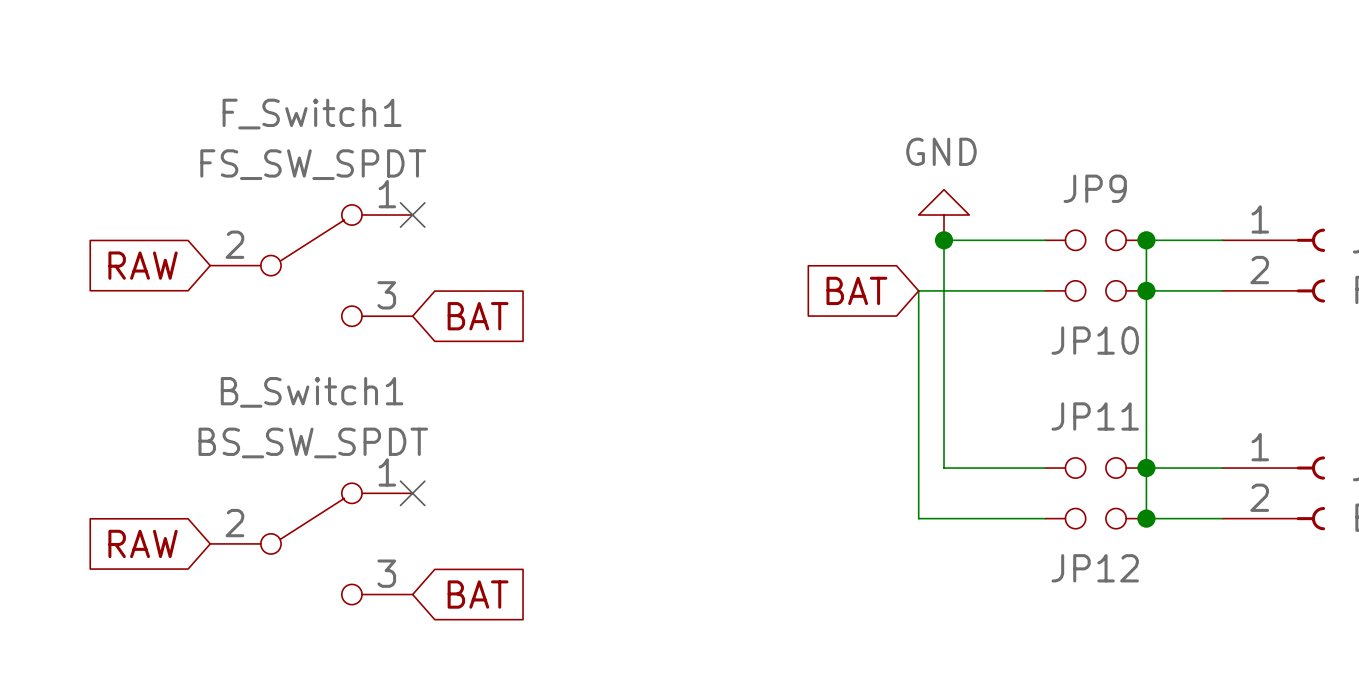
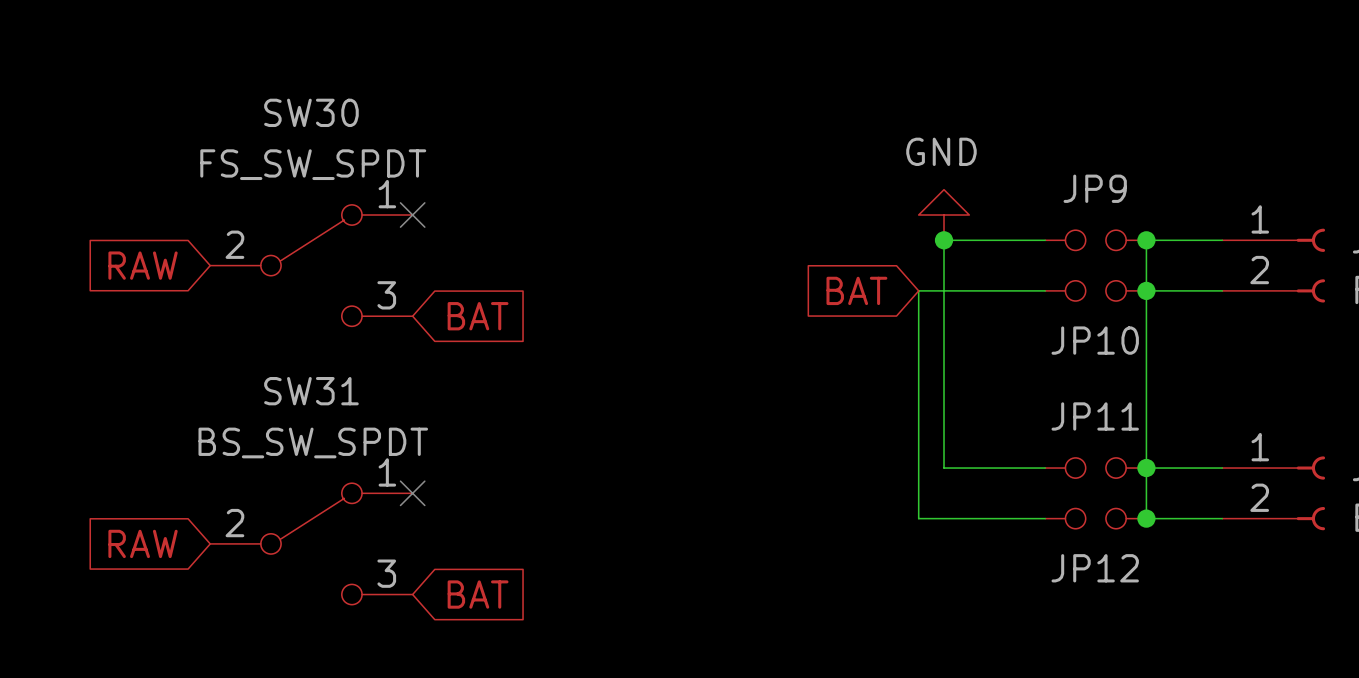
F_Switch1 name: F_Switch1 (312, 114) -> SW30 (311, 112)
B_Switch1 name: B_Switch1 (312, 392) -> SW31 (311, 391)

